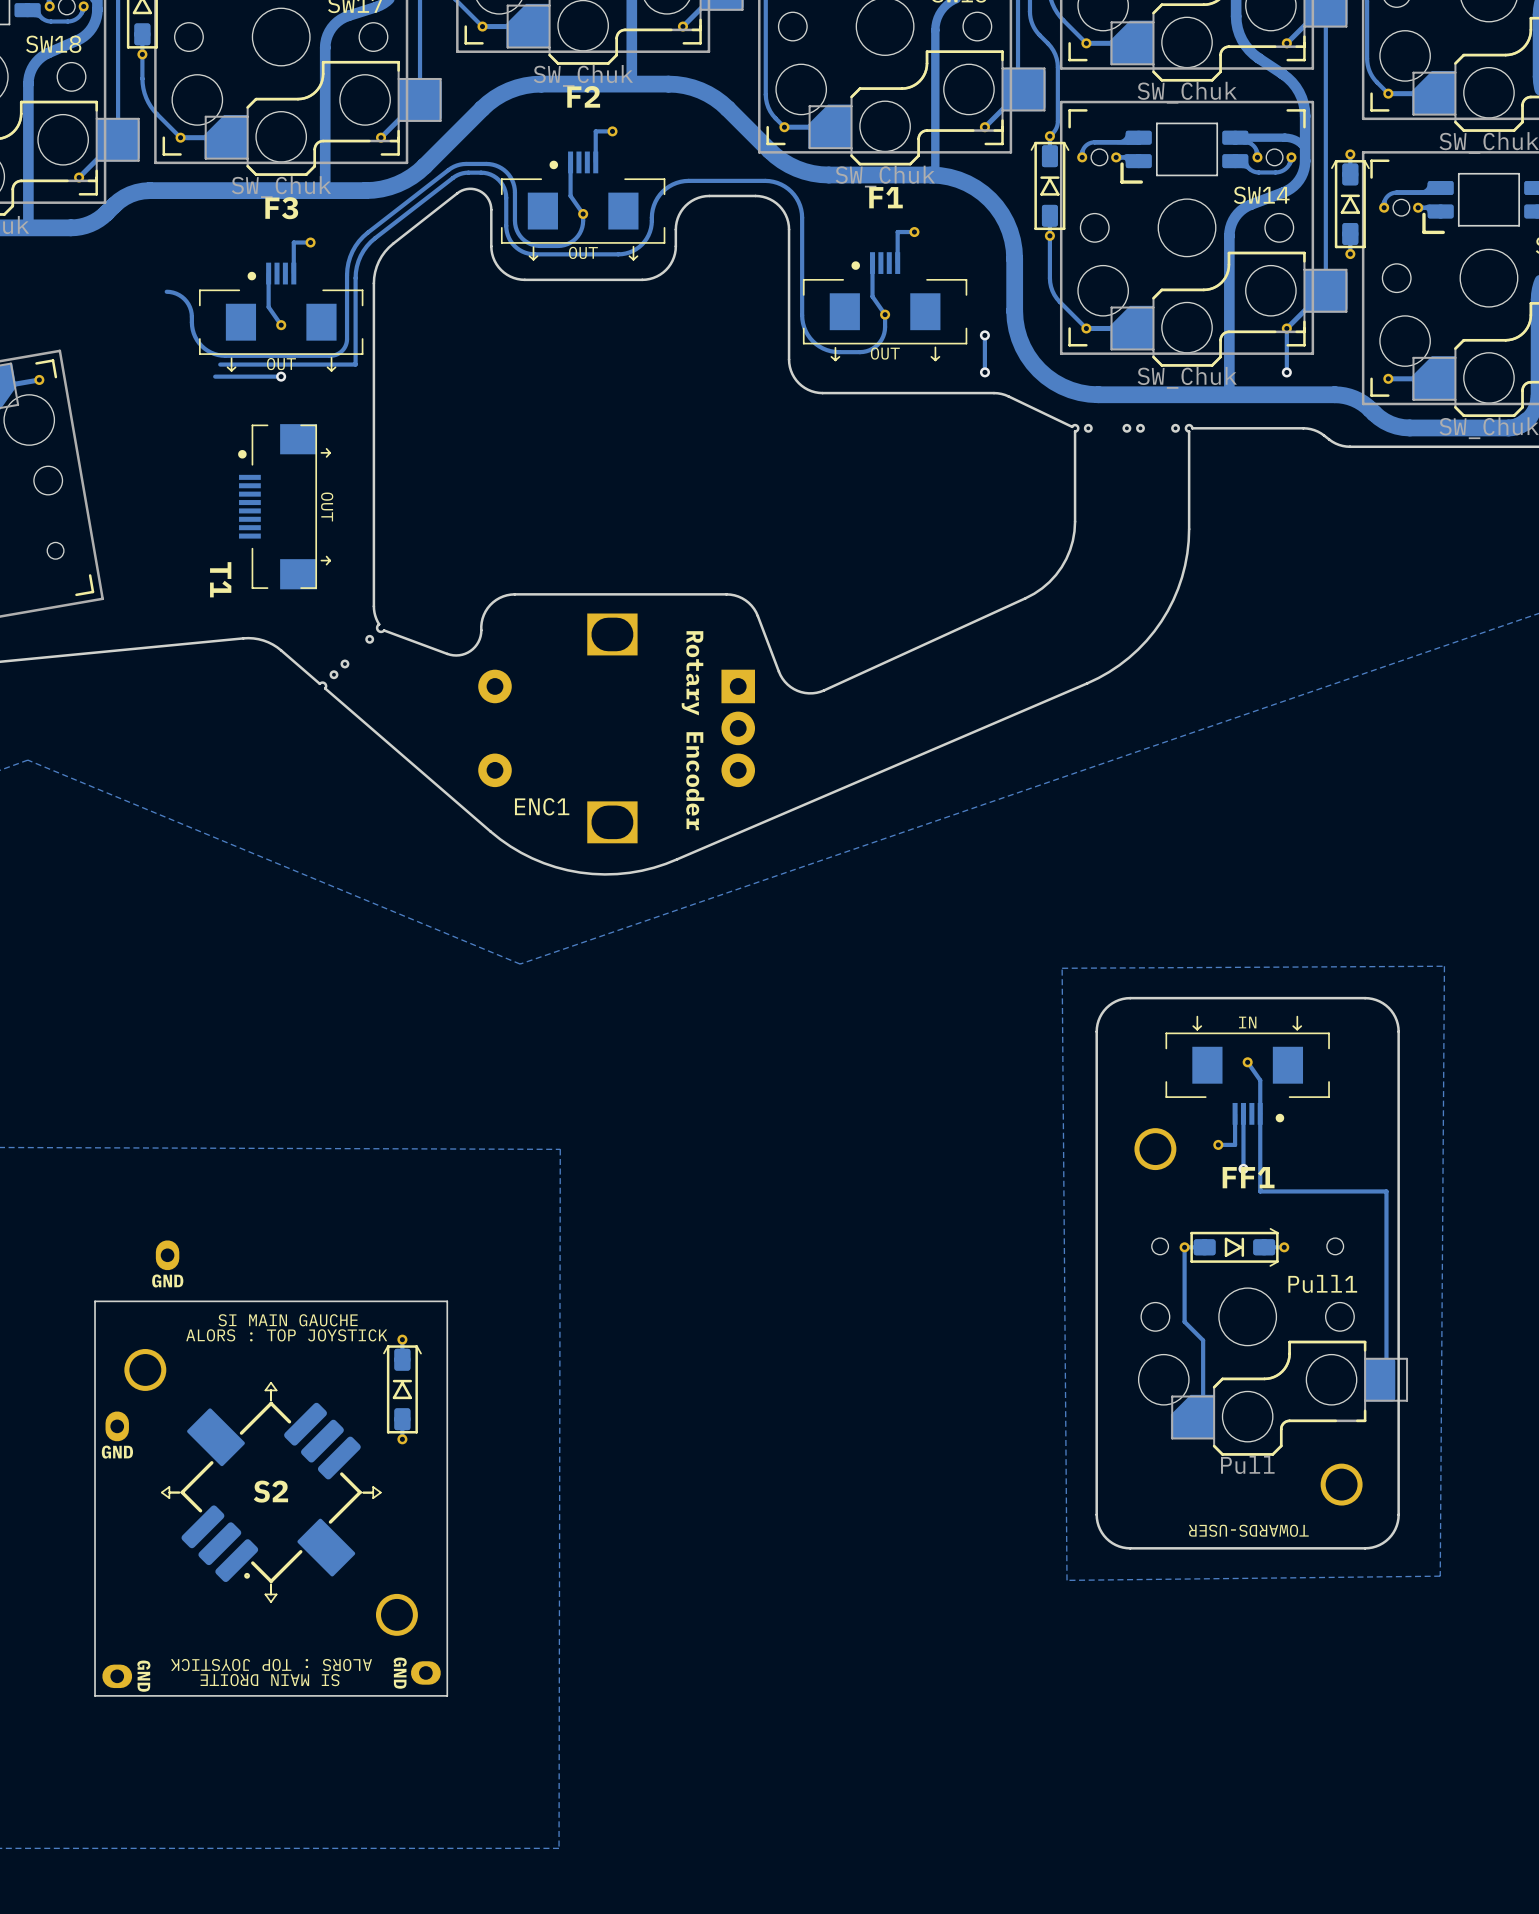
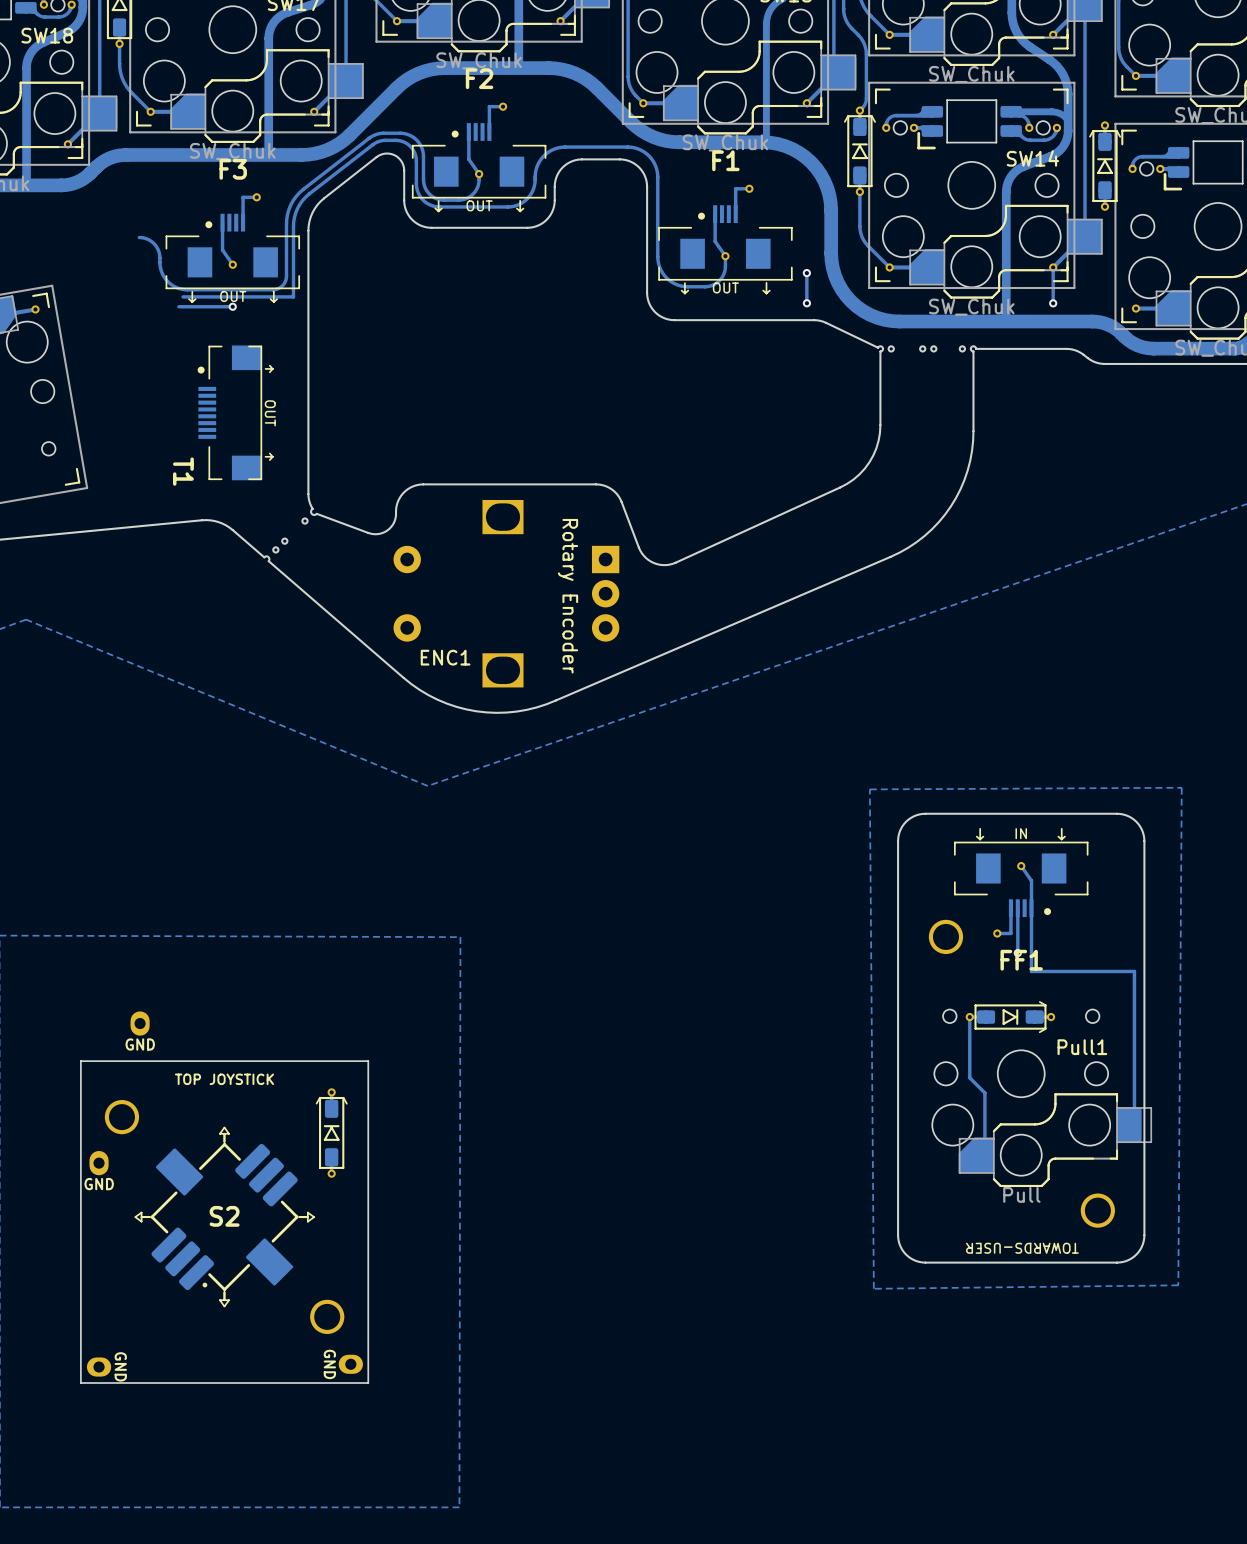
text: SI MAIN GAUCHE (288, 1320) -> none
text: ALORS : TOP JOYSTICK (286, 1335) -> TOP JOYSTICK (224, 1079)
text: ALORS : TOP JOYSTICK (271, 1665) -> none
text: SI MAIN DROITE (270, 1680) -> none

